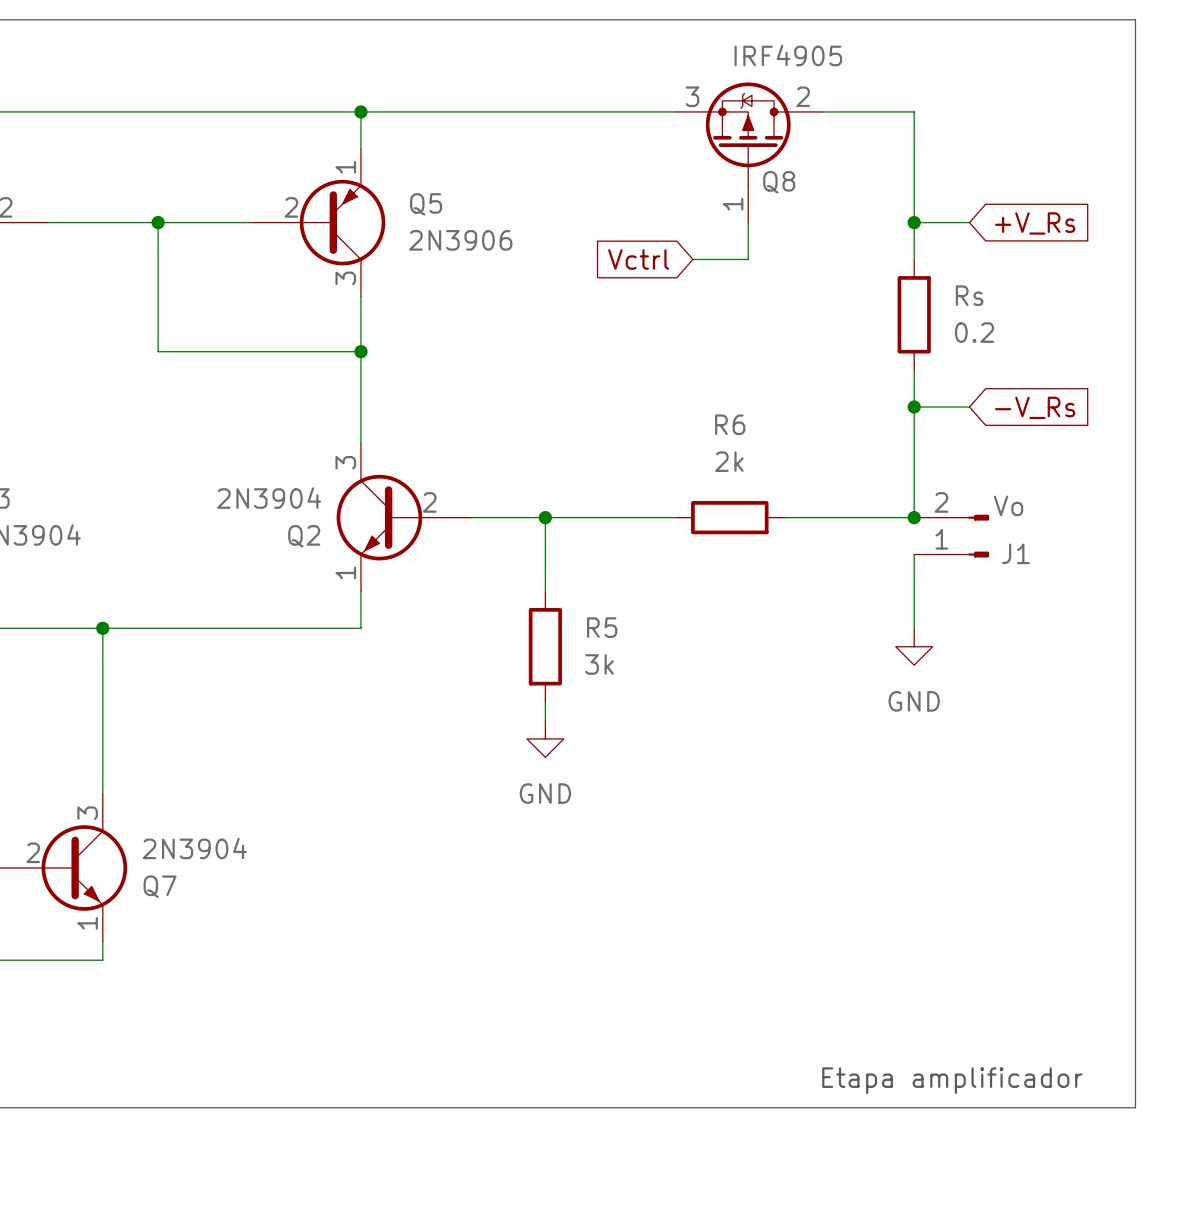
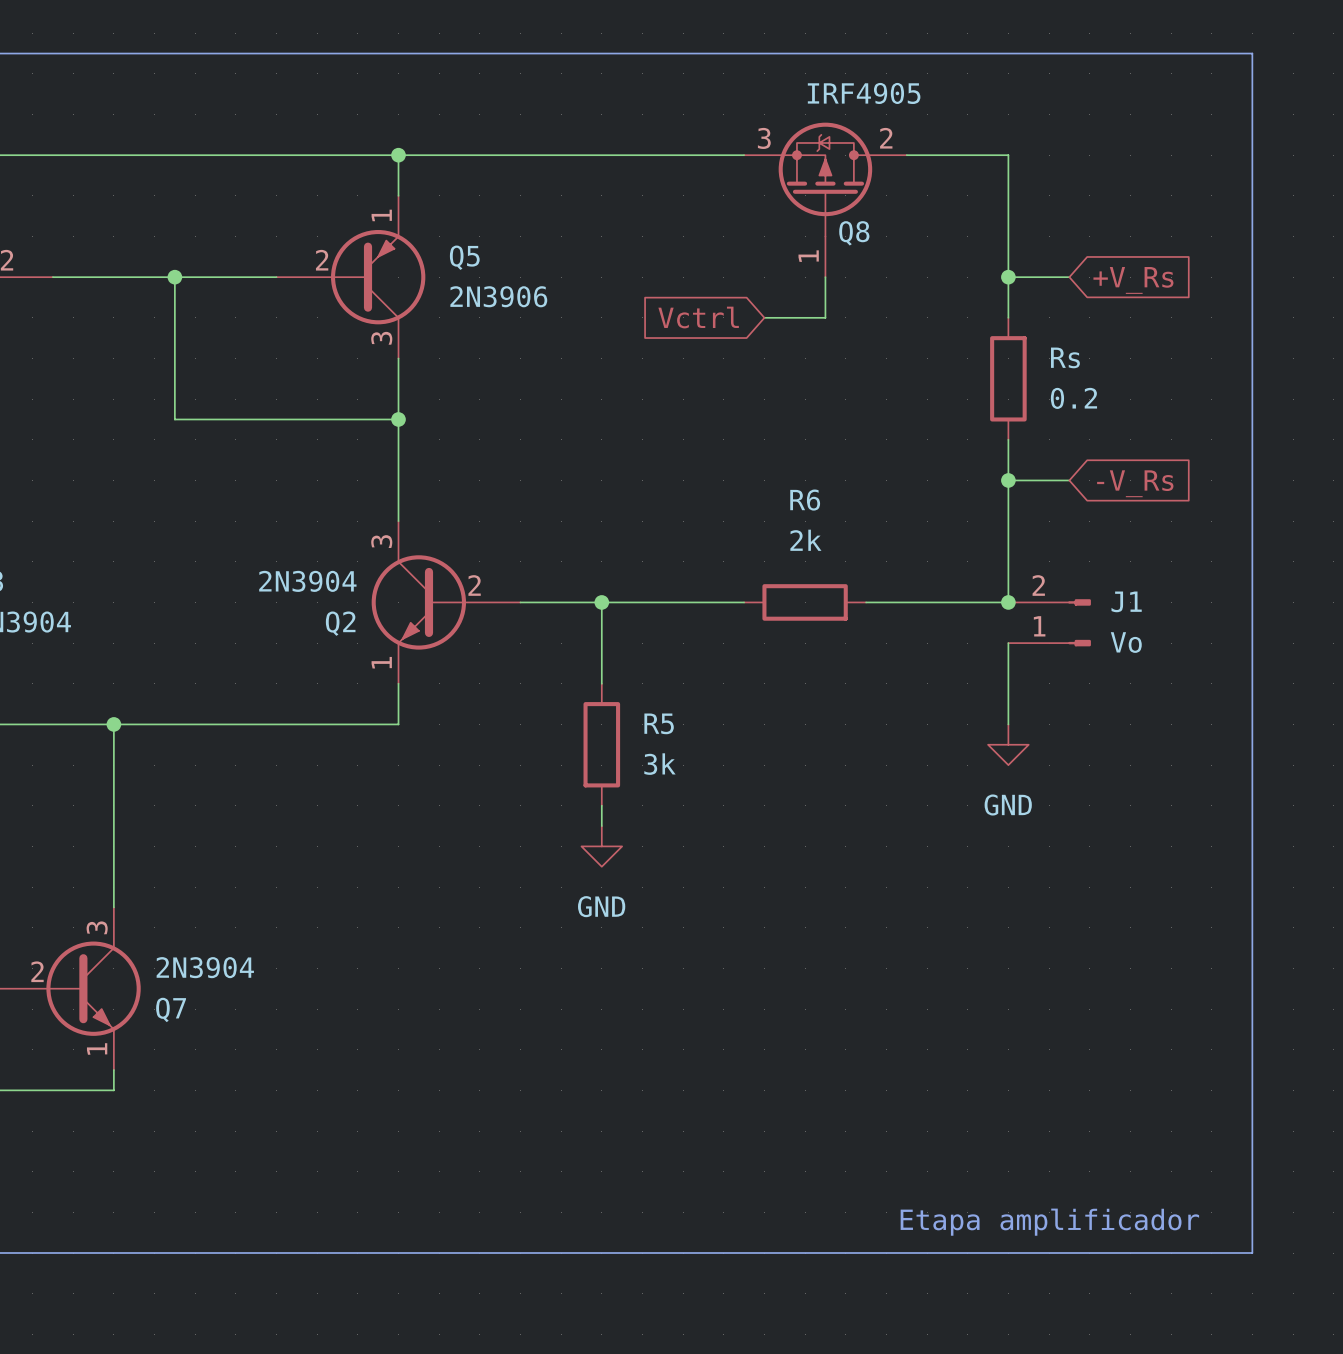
J1 value position: Vo (1008, 505) -> Vo (1126, 642)
J1 name position: J1 (1015, 553) -> J1 (1126, 601)

